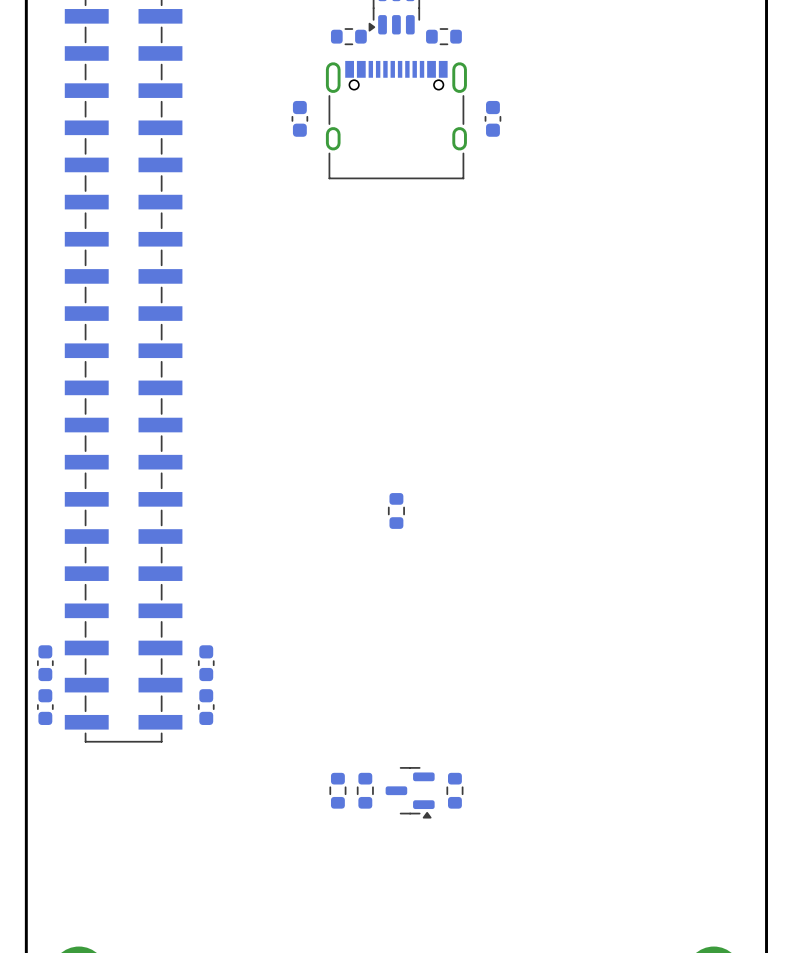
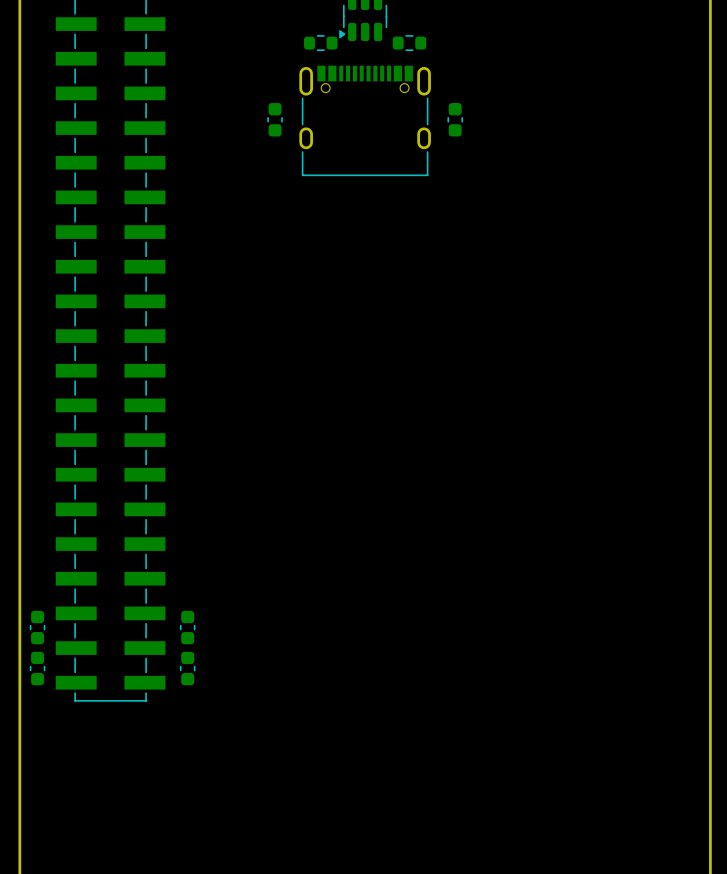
part: (396, 510) -> none
part: (337, 790) -> none
part: (365, 790) -> none
part: (454, 790) -> none
part: (410, 792) -> none

